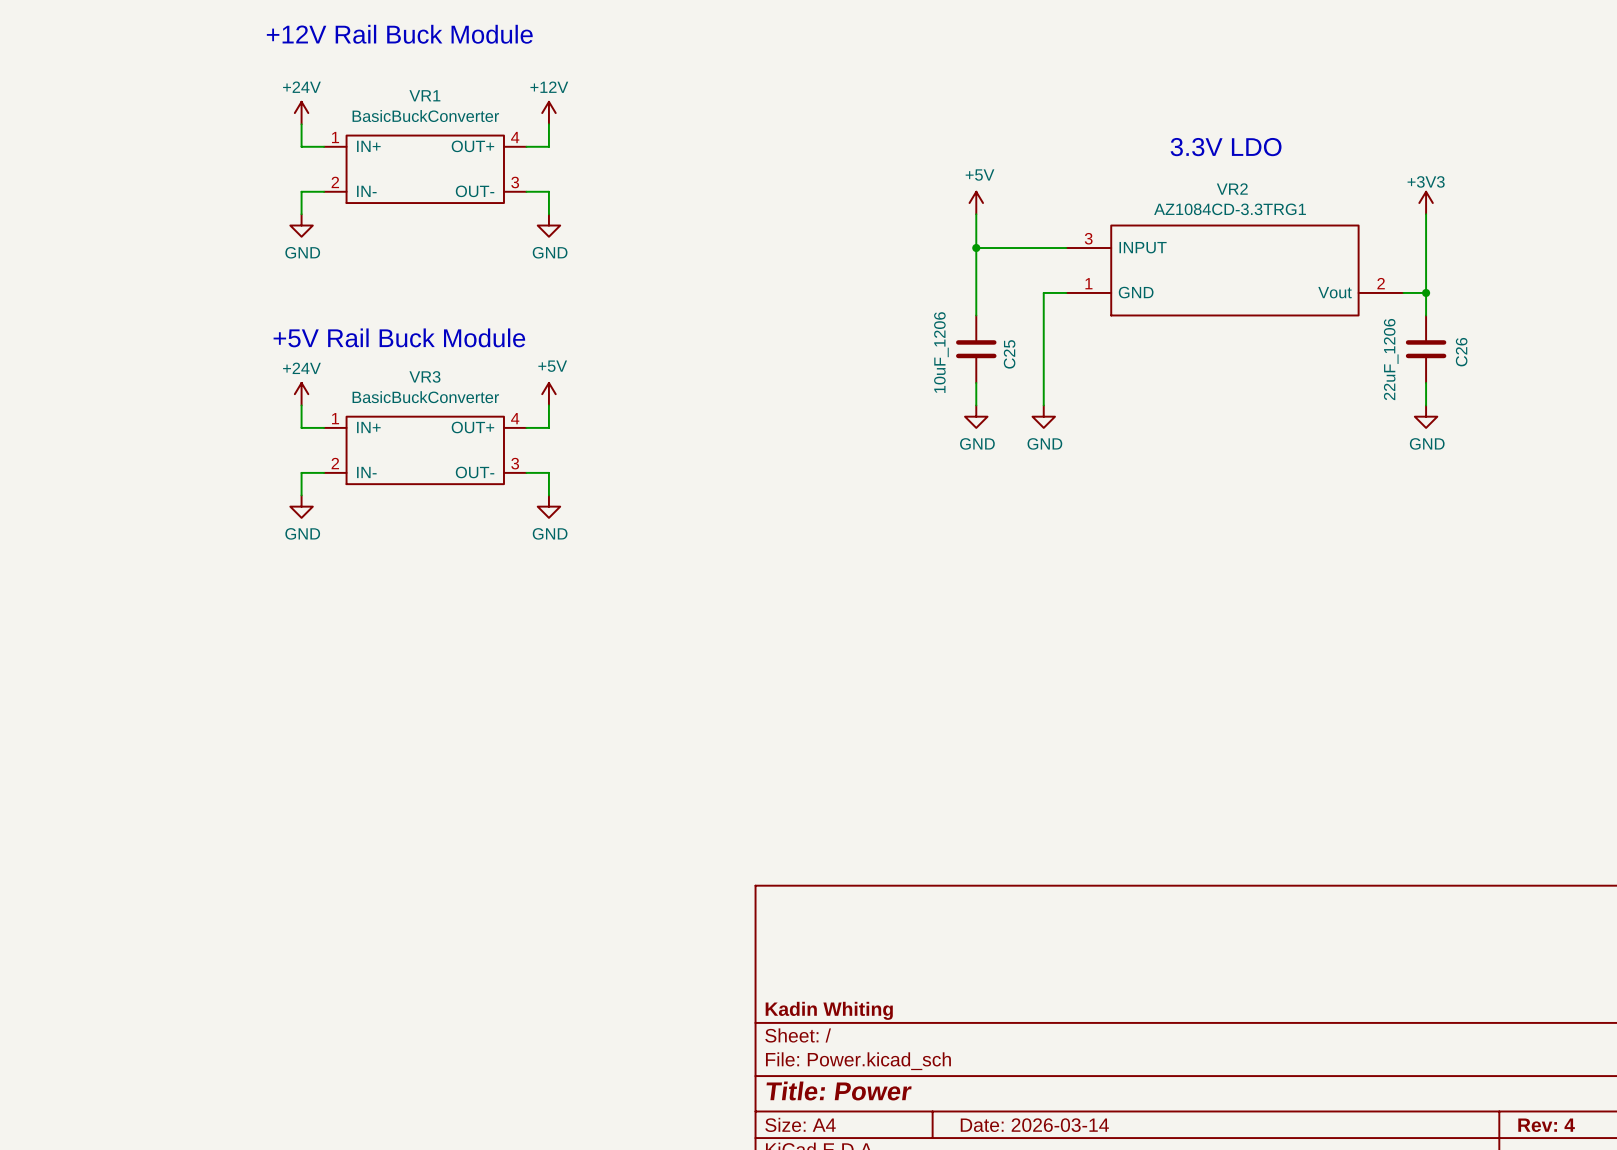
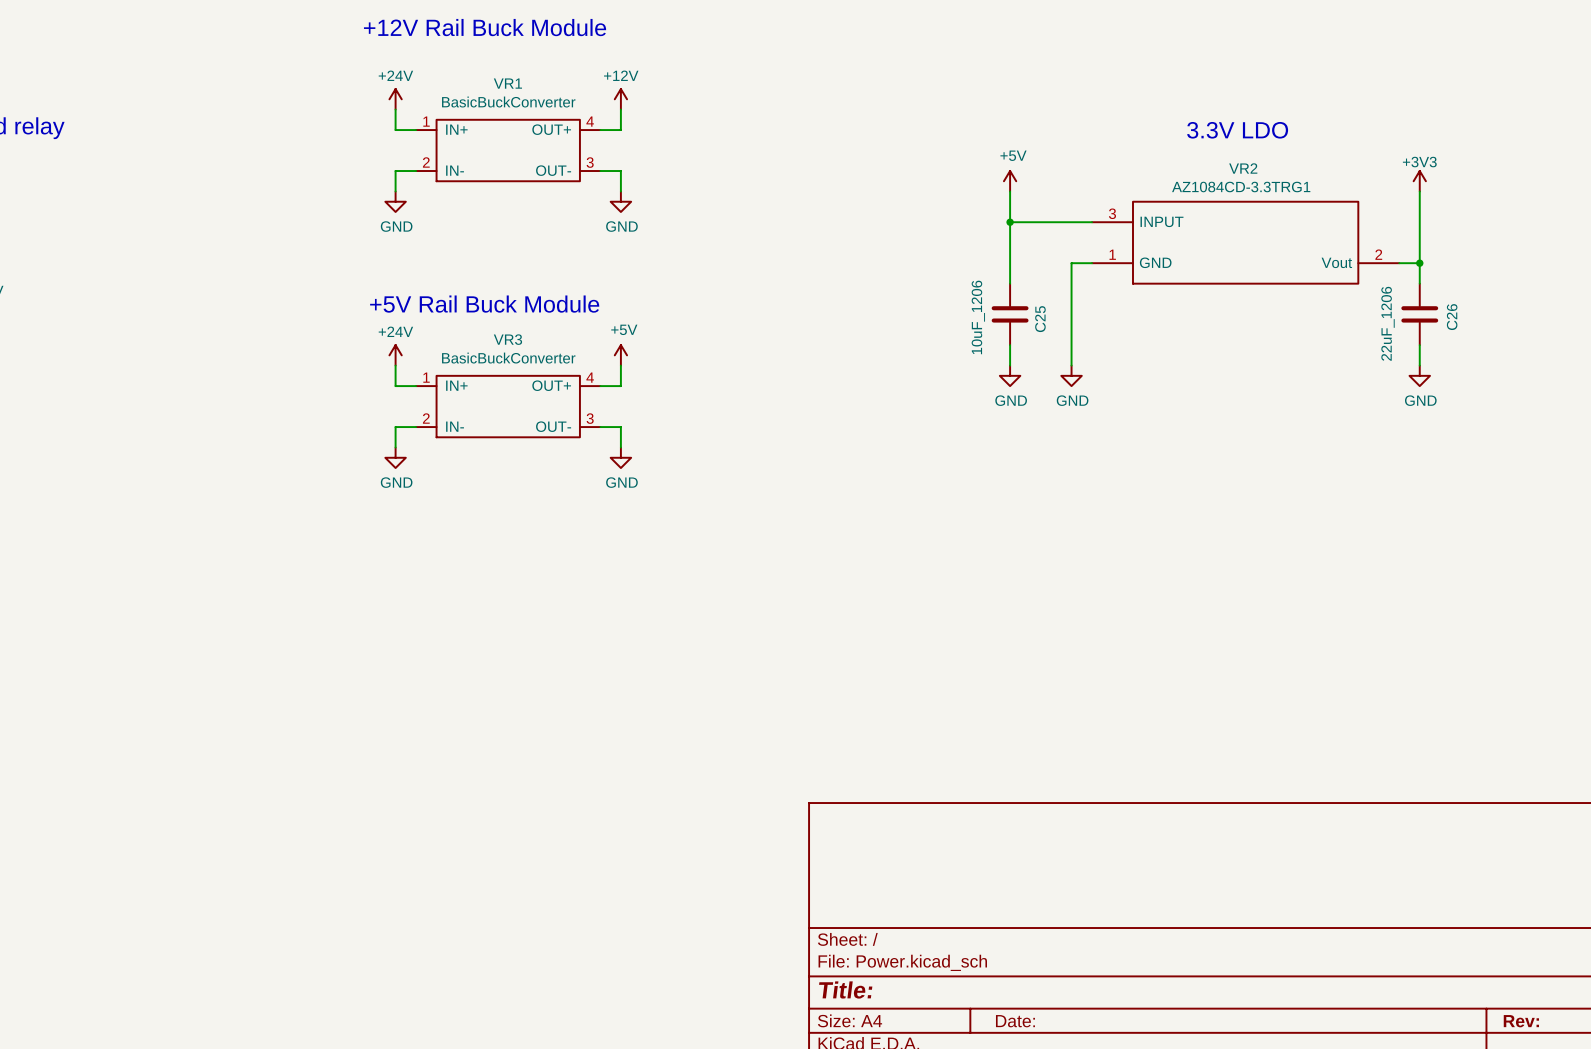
title block: Kadin Whiting (829, 1010) -> none
title block: Title: Power (839, 1090) -> Title: (845, 989)
title block: Date: 2026-03-14 (1034, 1125) -> Date: (1015, 1021)
title block: Rev: 4 (1546, 1125) -> Rev: (1521, 1021)

